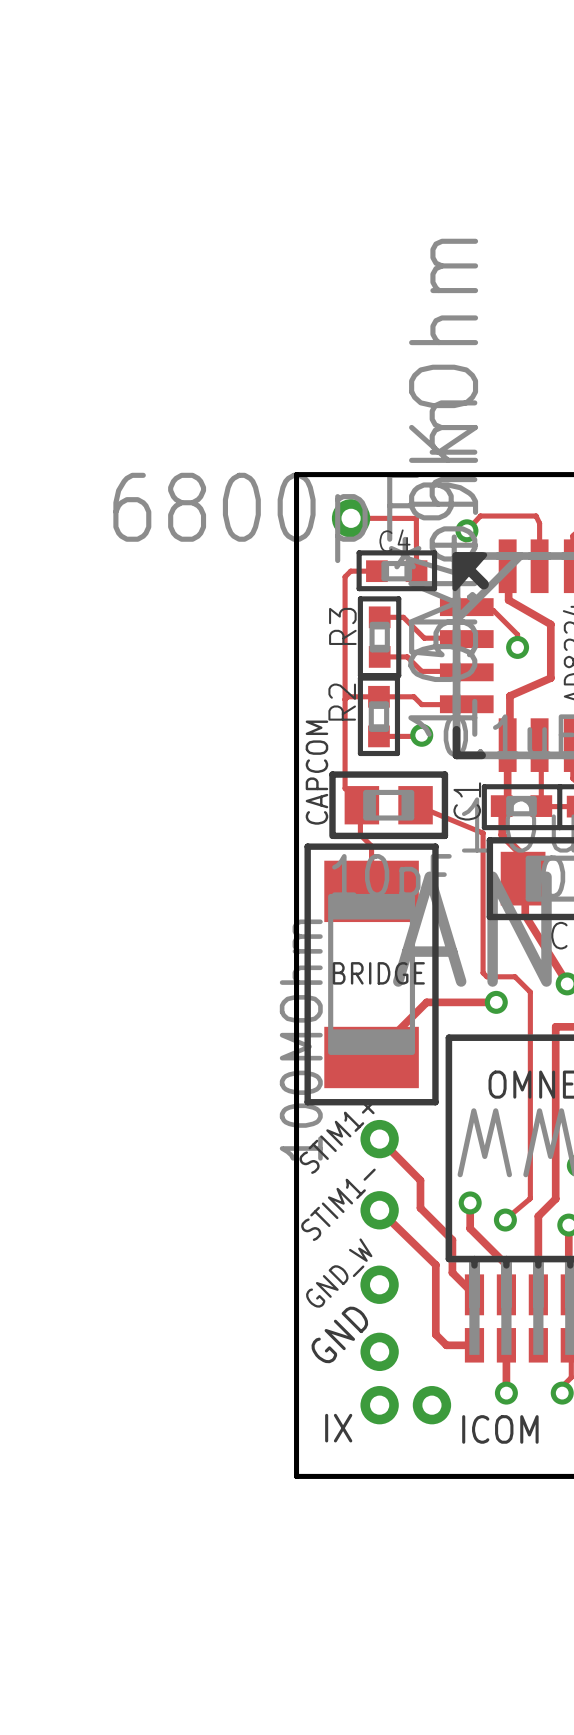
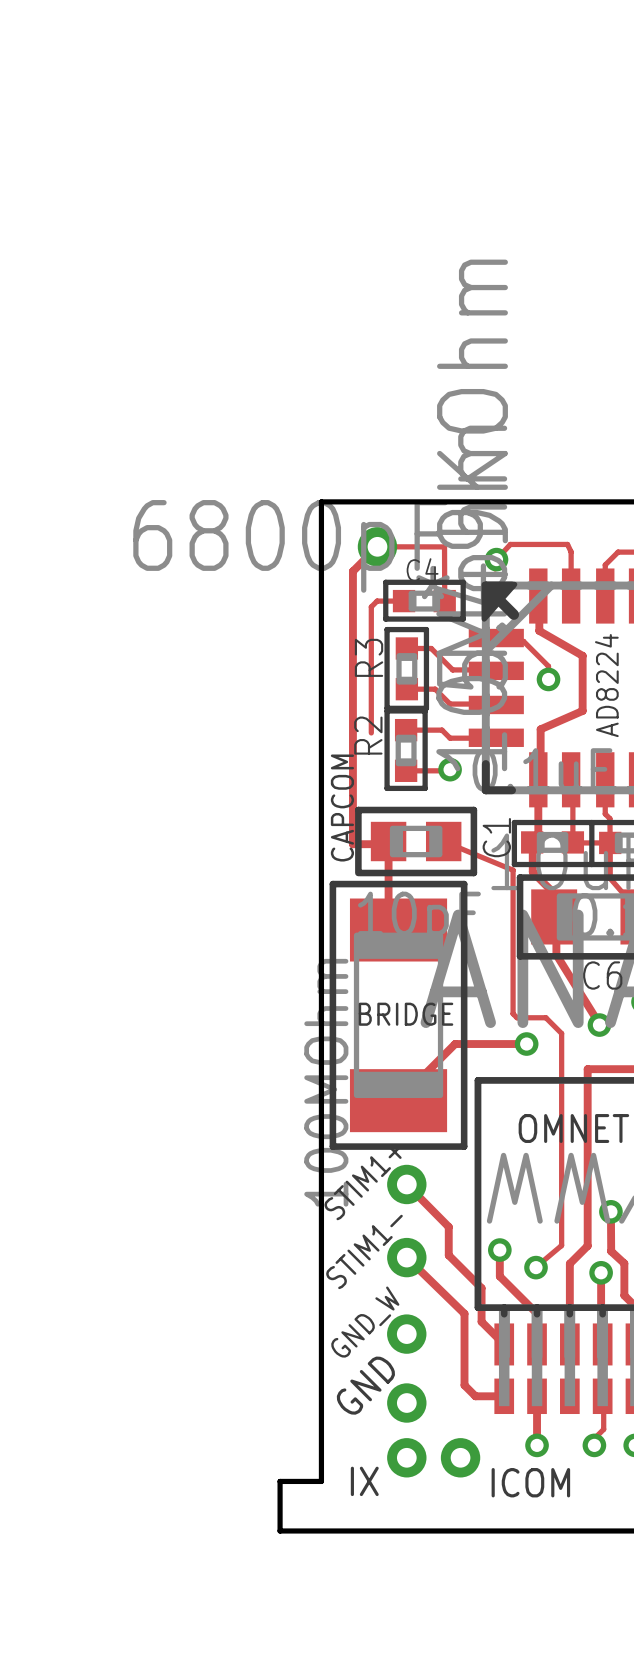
track: (378, 696) (347, 696) (345, 699) (345, 788) (361, 805) (360, 834) (371, 846) (371, 891) -> (377, 546) (352, 571) (352, 844) (390, 844) (388, 841) (388, 930) (398, 930)
board edge: (296, 1428) (296, 1476) -> (321, 1481) (280, 1481) (280, 1530) (321, 1530)

